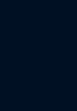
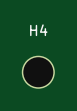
H4: none -> (38, 72)

